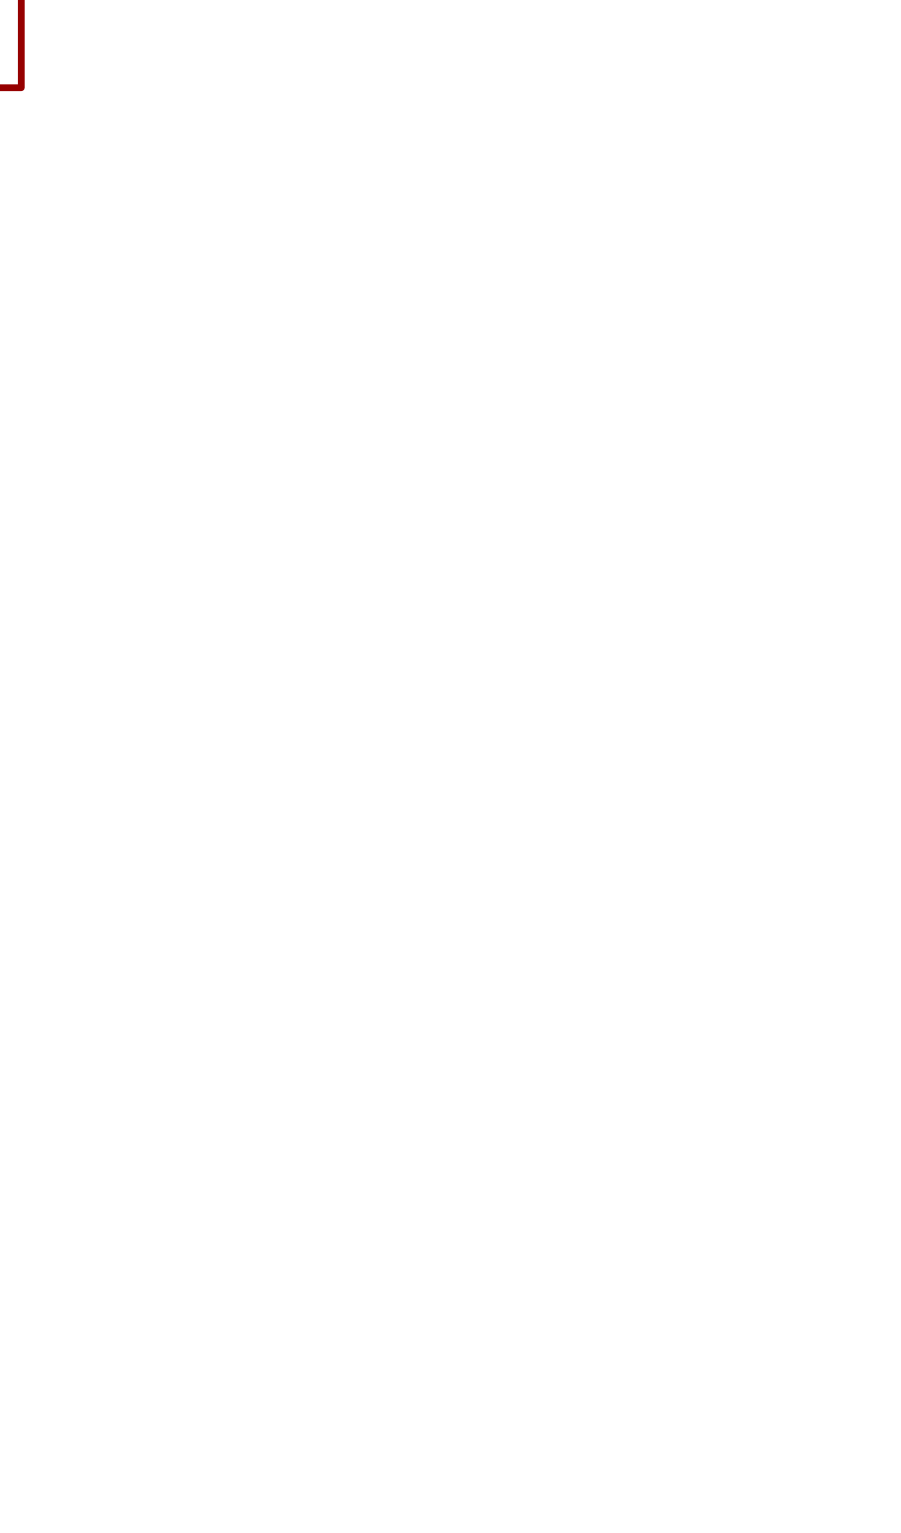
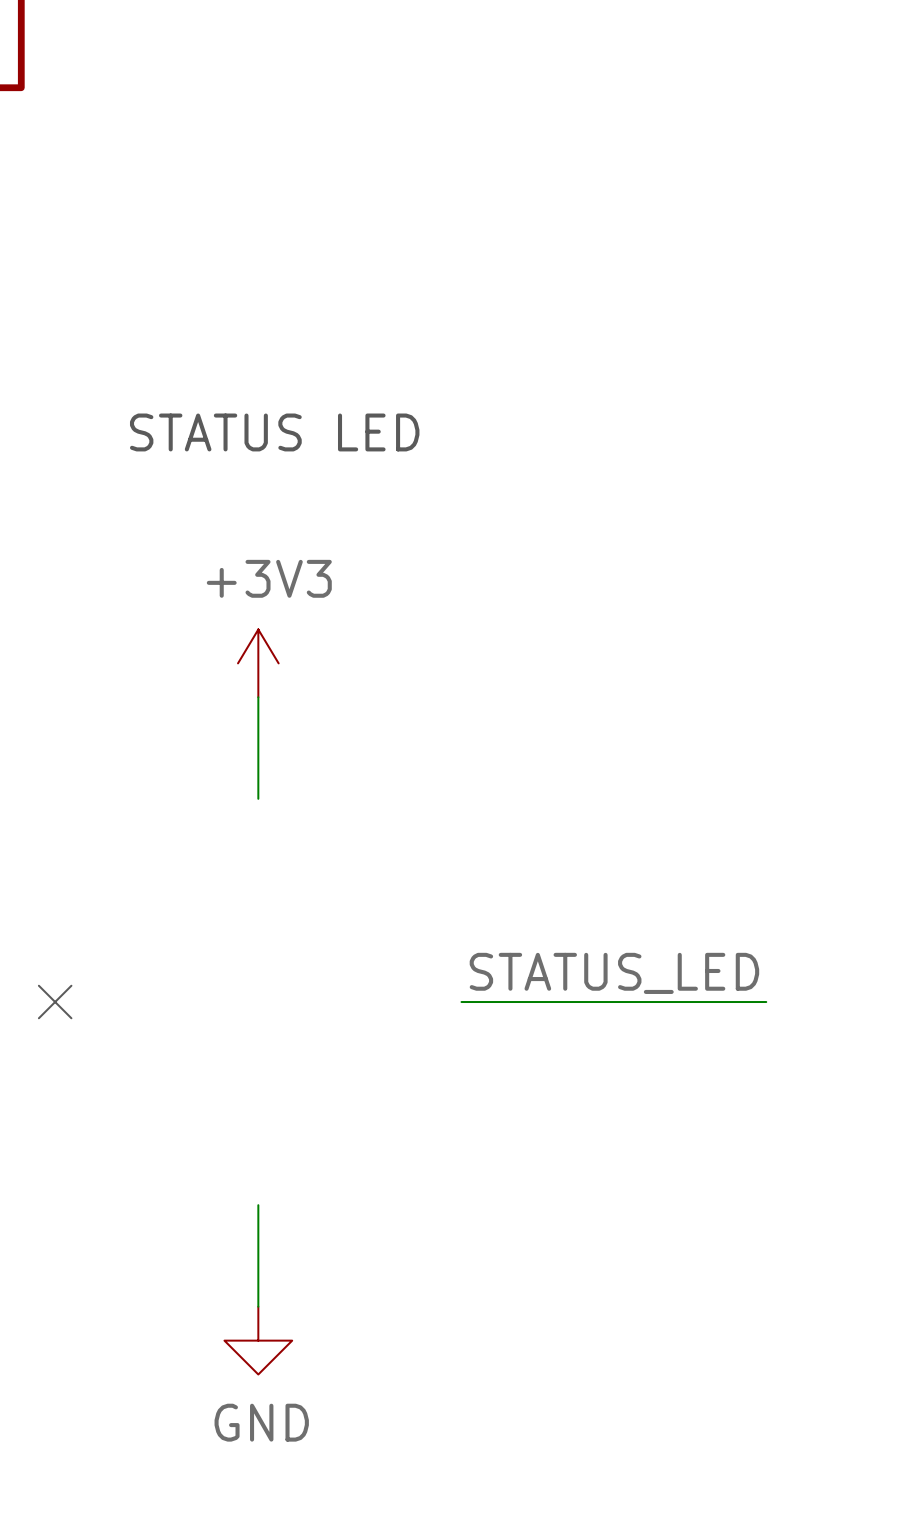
text: none -> STATUS LED (274, 432)
power symbol: none -> +3V3 (258, 663)
wire: none -> (258, 697) (258, 798)
label: none -> STATUS_LED (614, 973)
no-connect mark: none -> (55, 1002)
wire: none -> (461, 1002) (766, 1002)
wire: none -> (258, 1205) (258, 1306)
power symbol: none -> GND (258, 1340)

